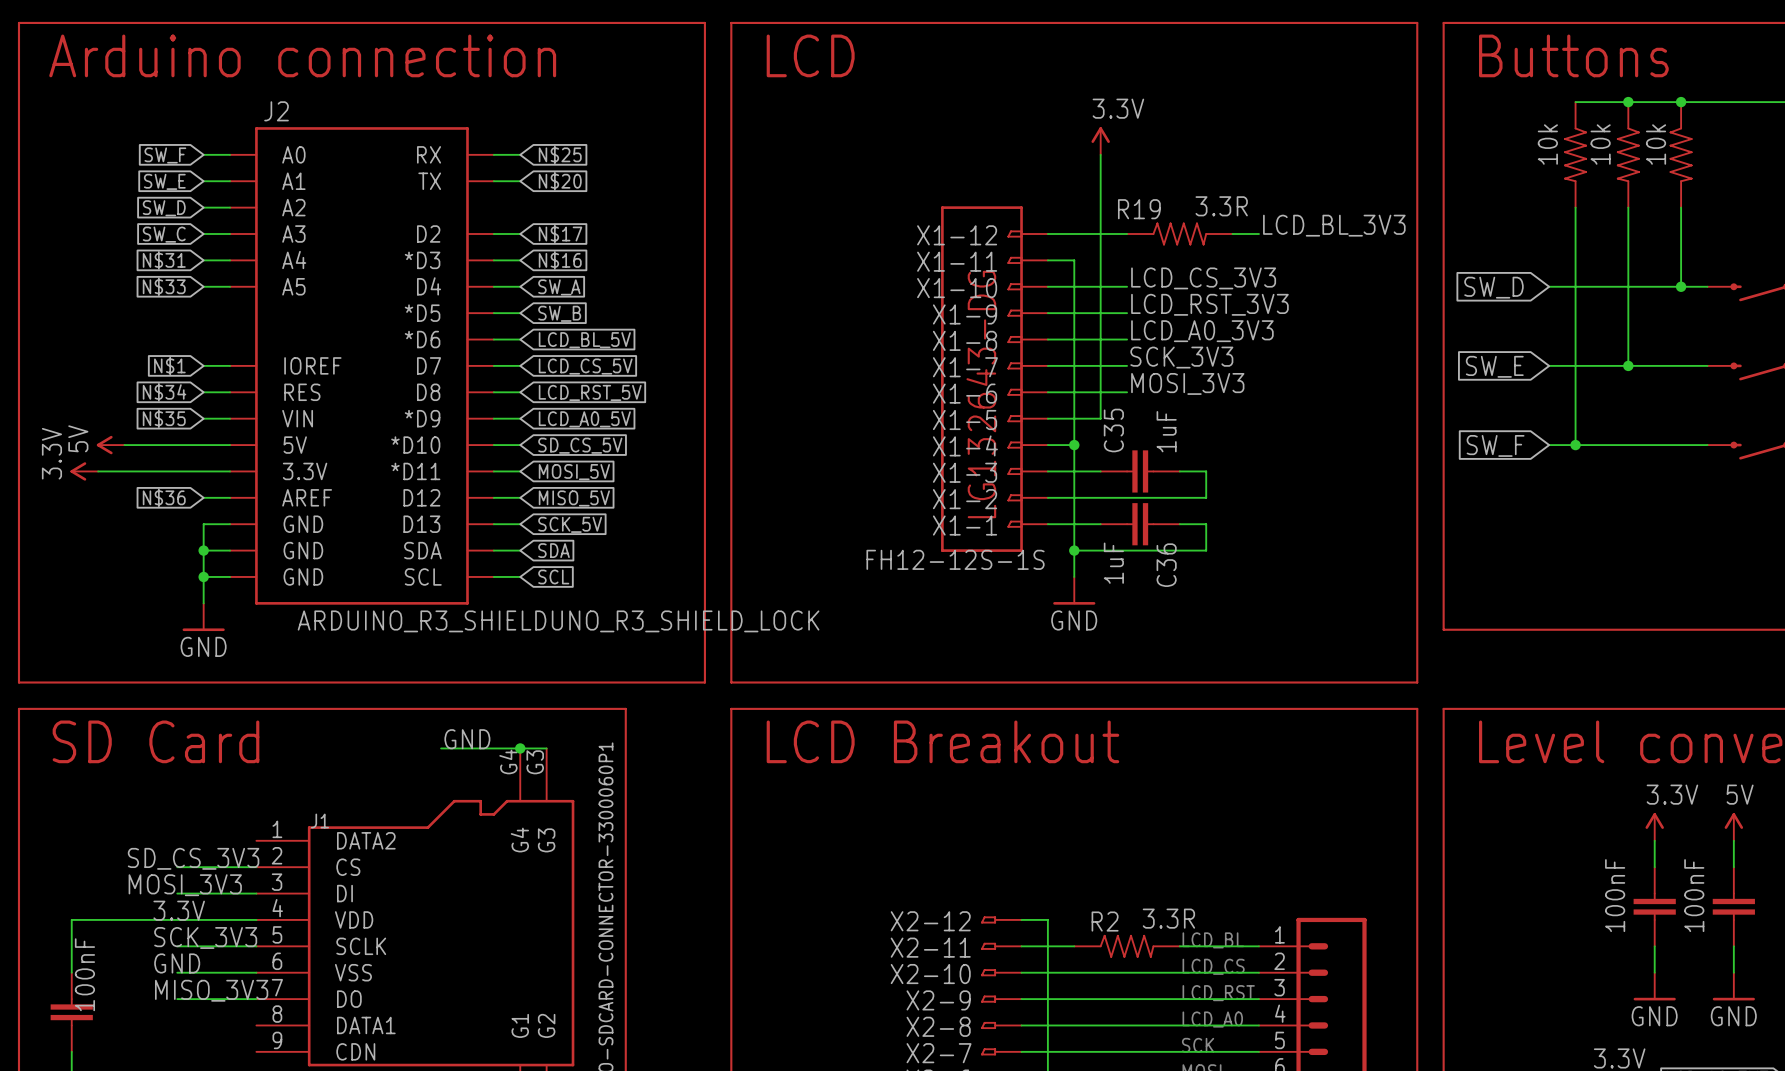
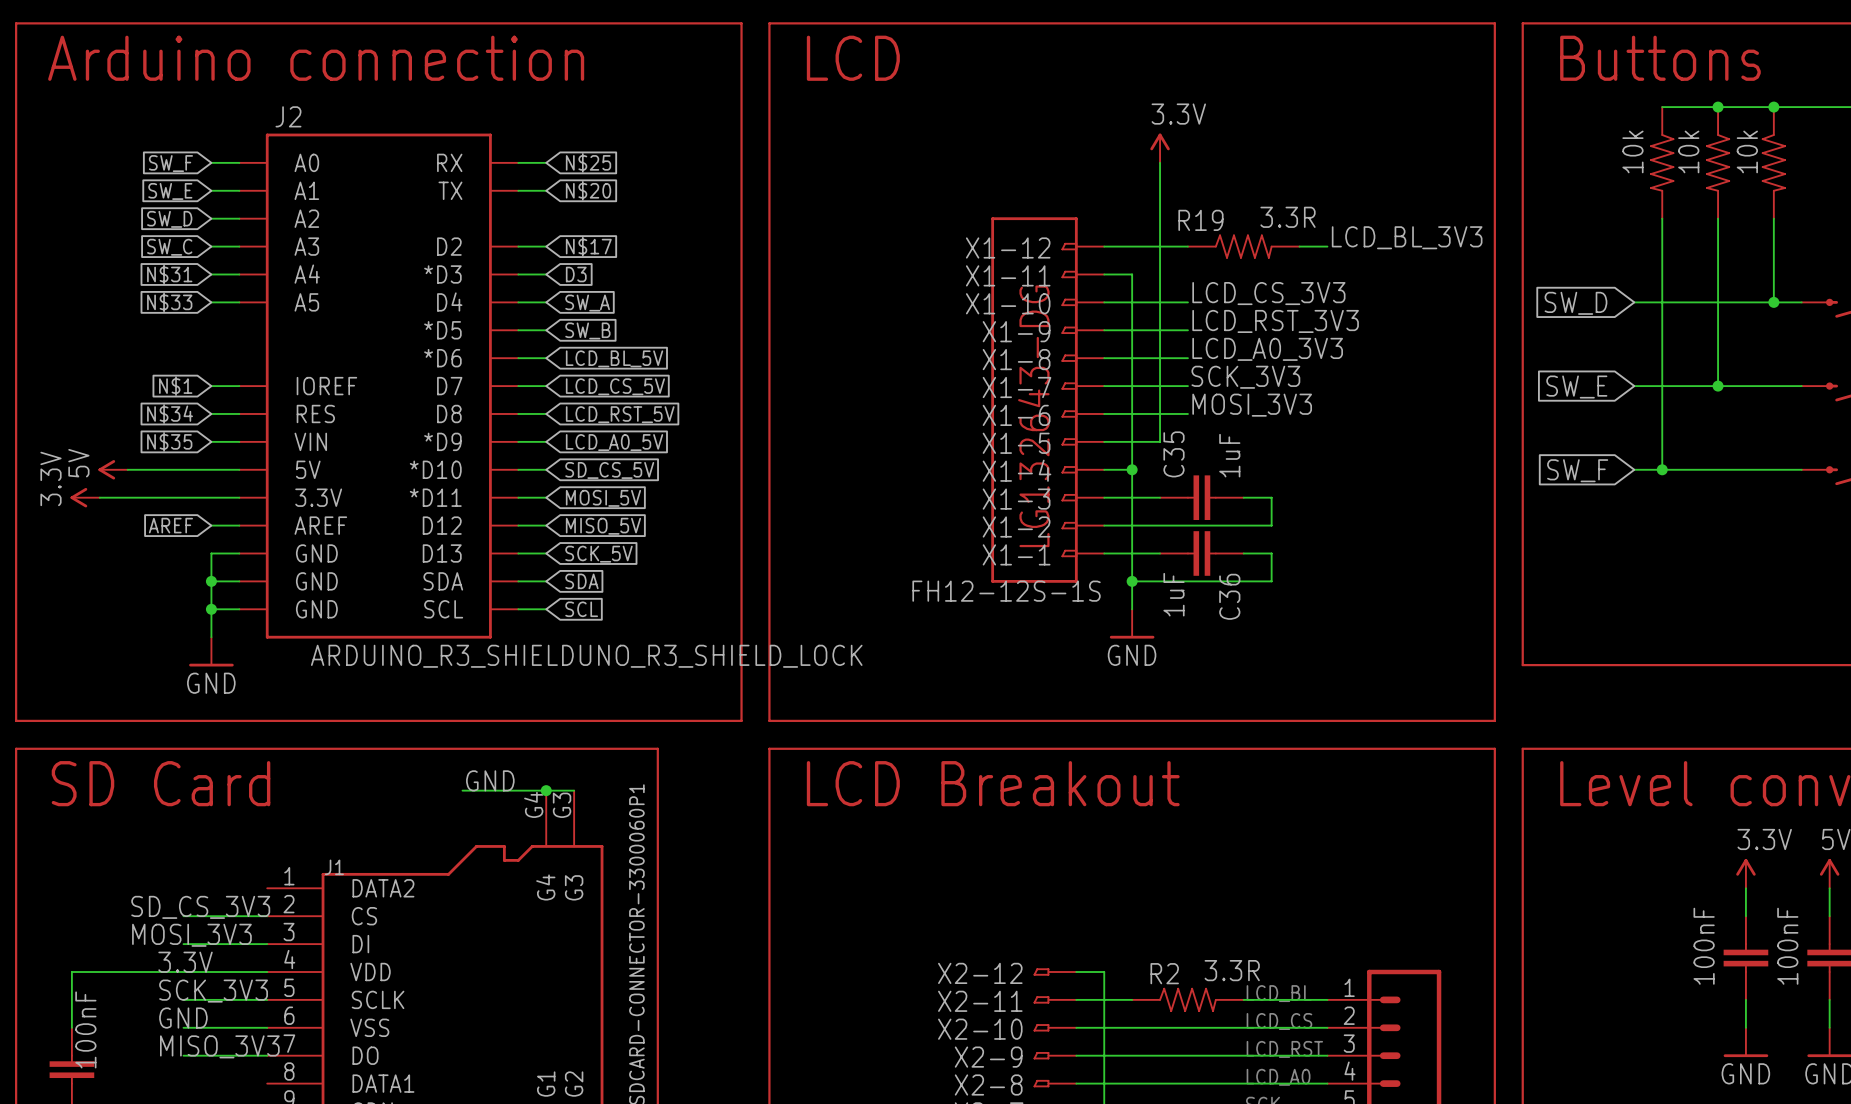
global label: N$16 (560, 260) -> D3 (576, 274)
global label: N$36 (164, 497) -> AREF (170, 525)

